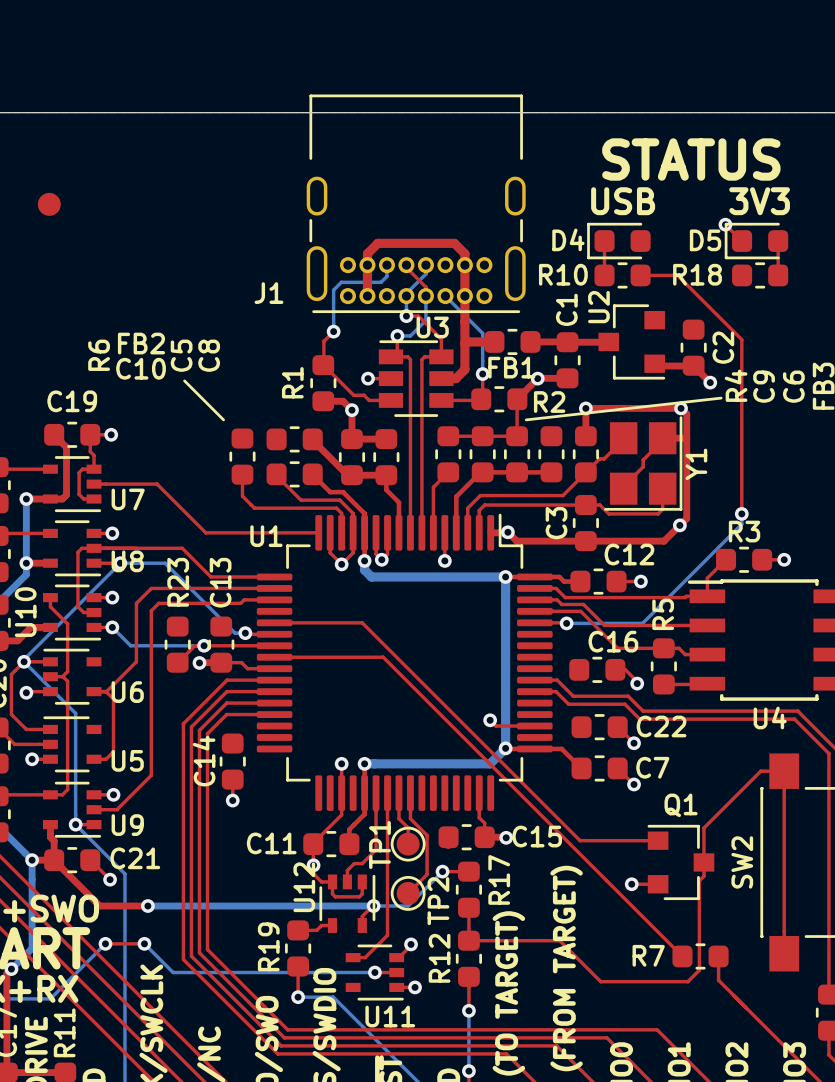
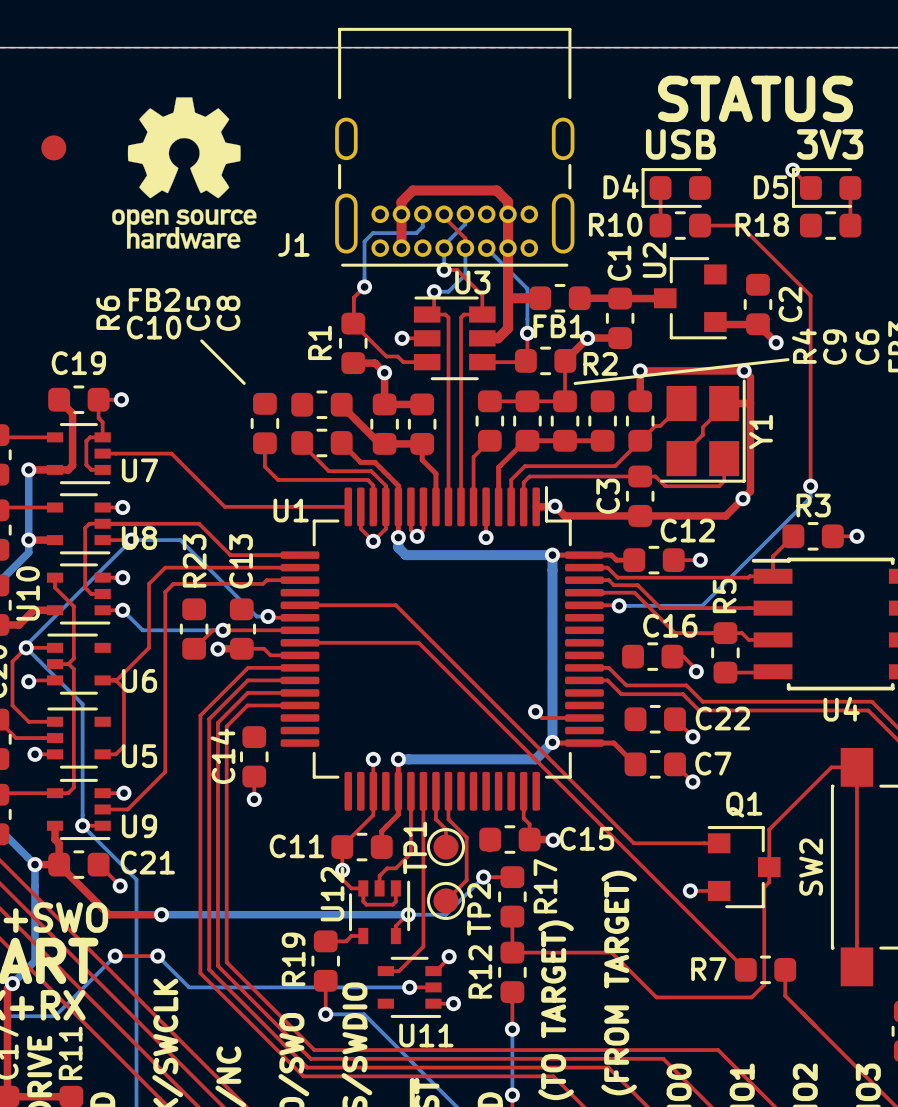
drawing: none -> [112, 97, 257, 249]

